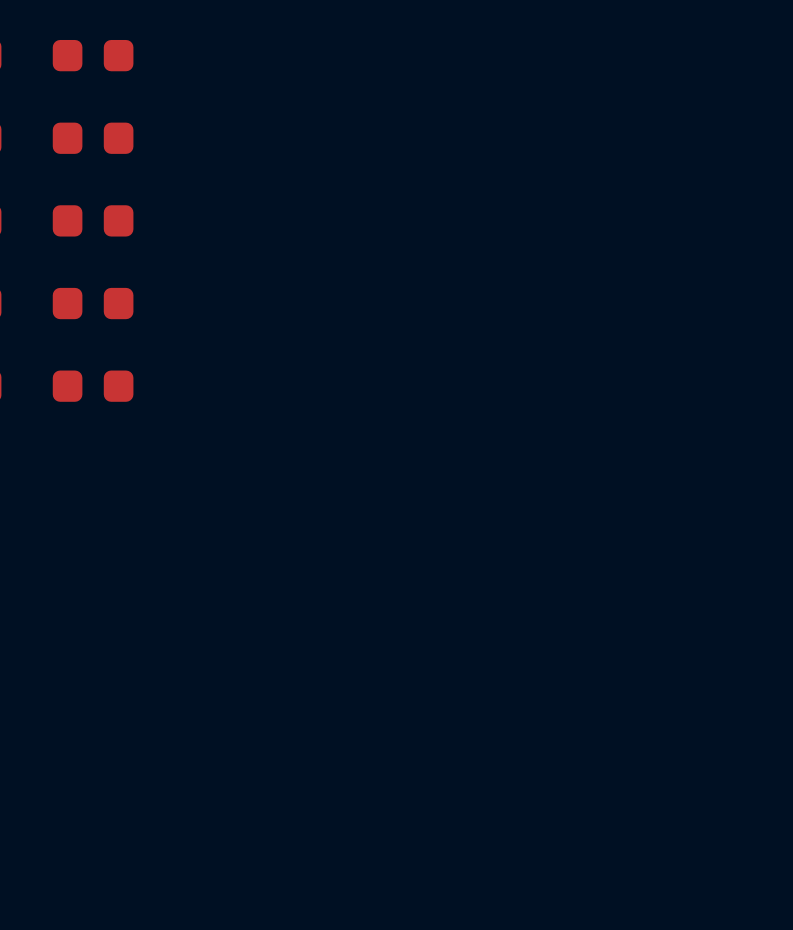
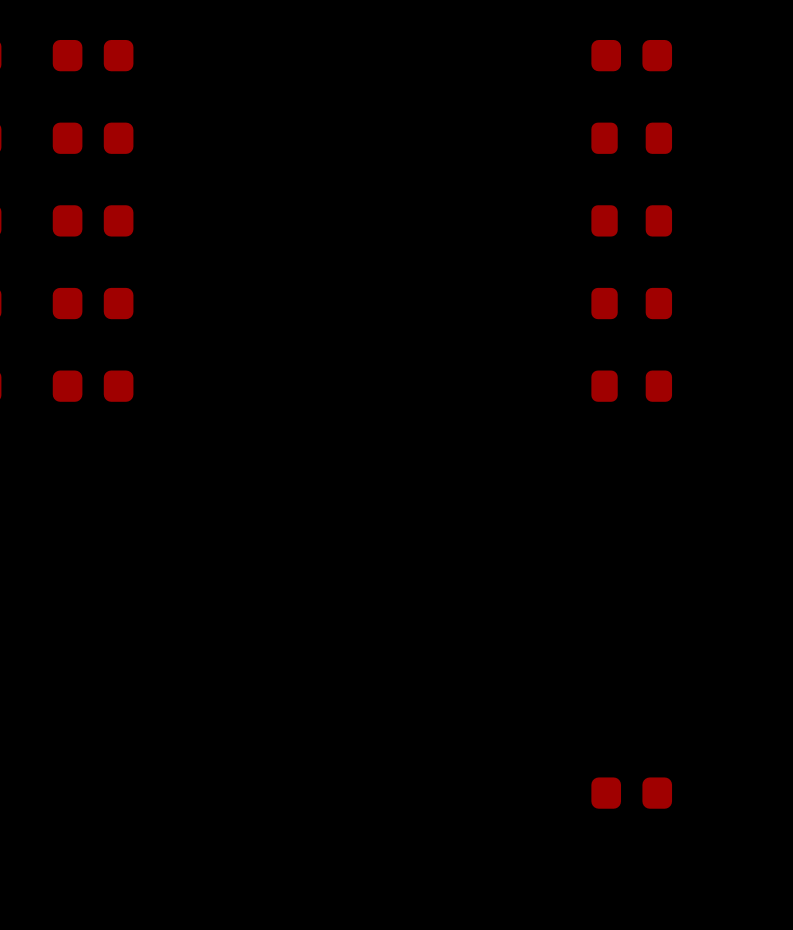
part: none -> (631, 55)
part: none -> (631, 138)
part: none -> (631, 220)
part: none -> (631, 303)
part: none -> (631, 386)
part: none -> (631, 793)

